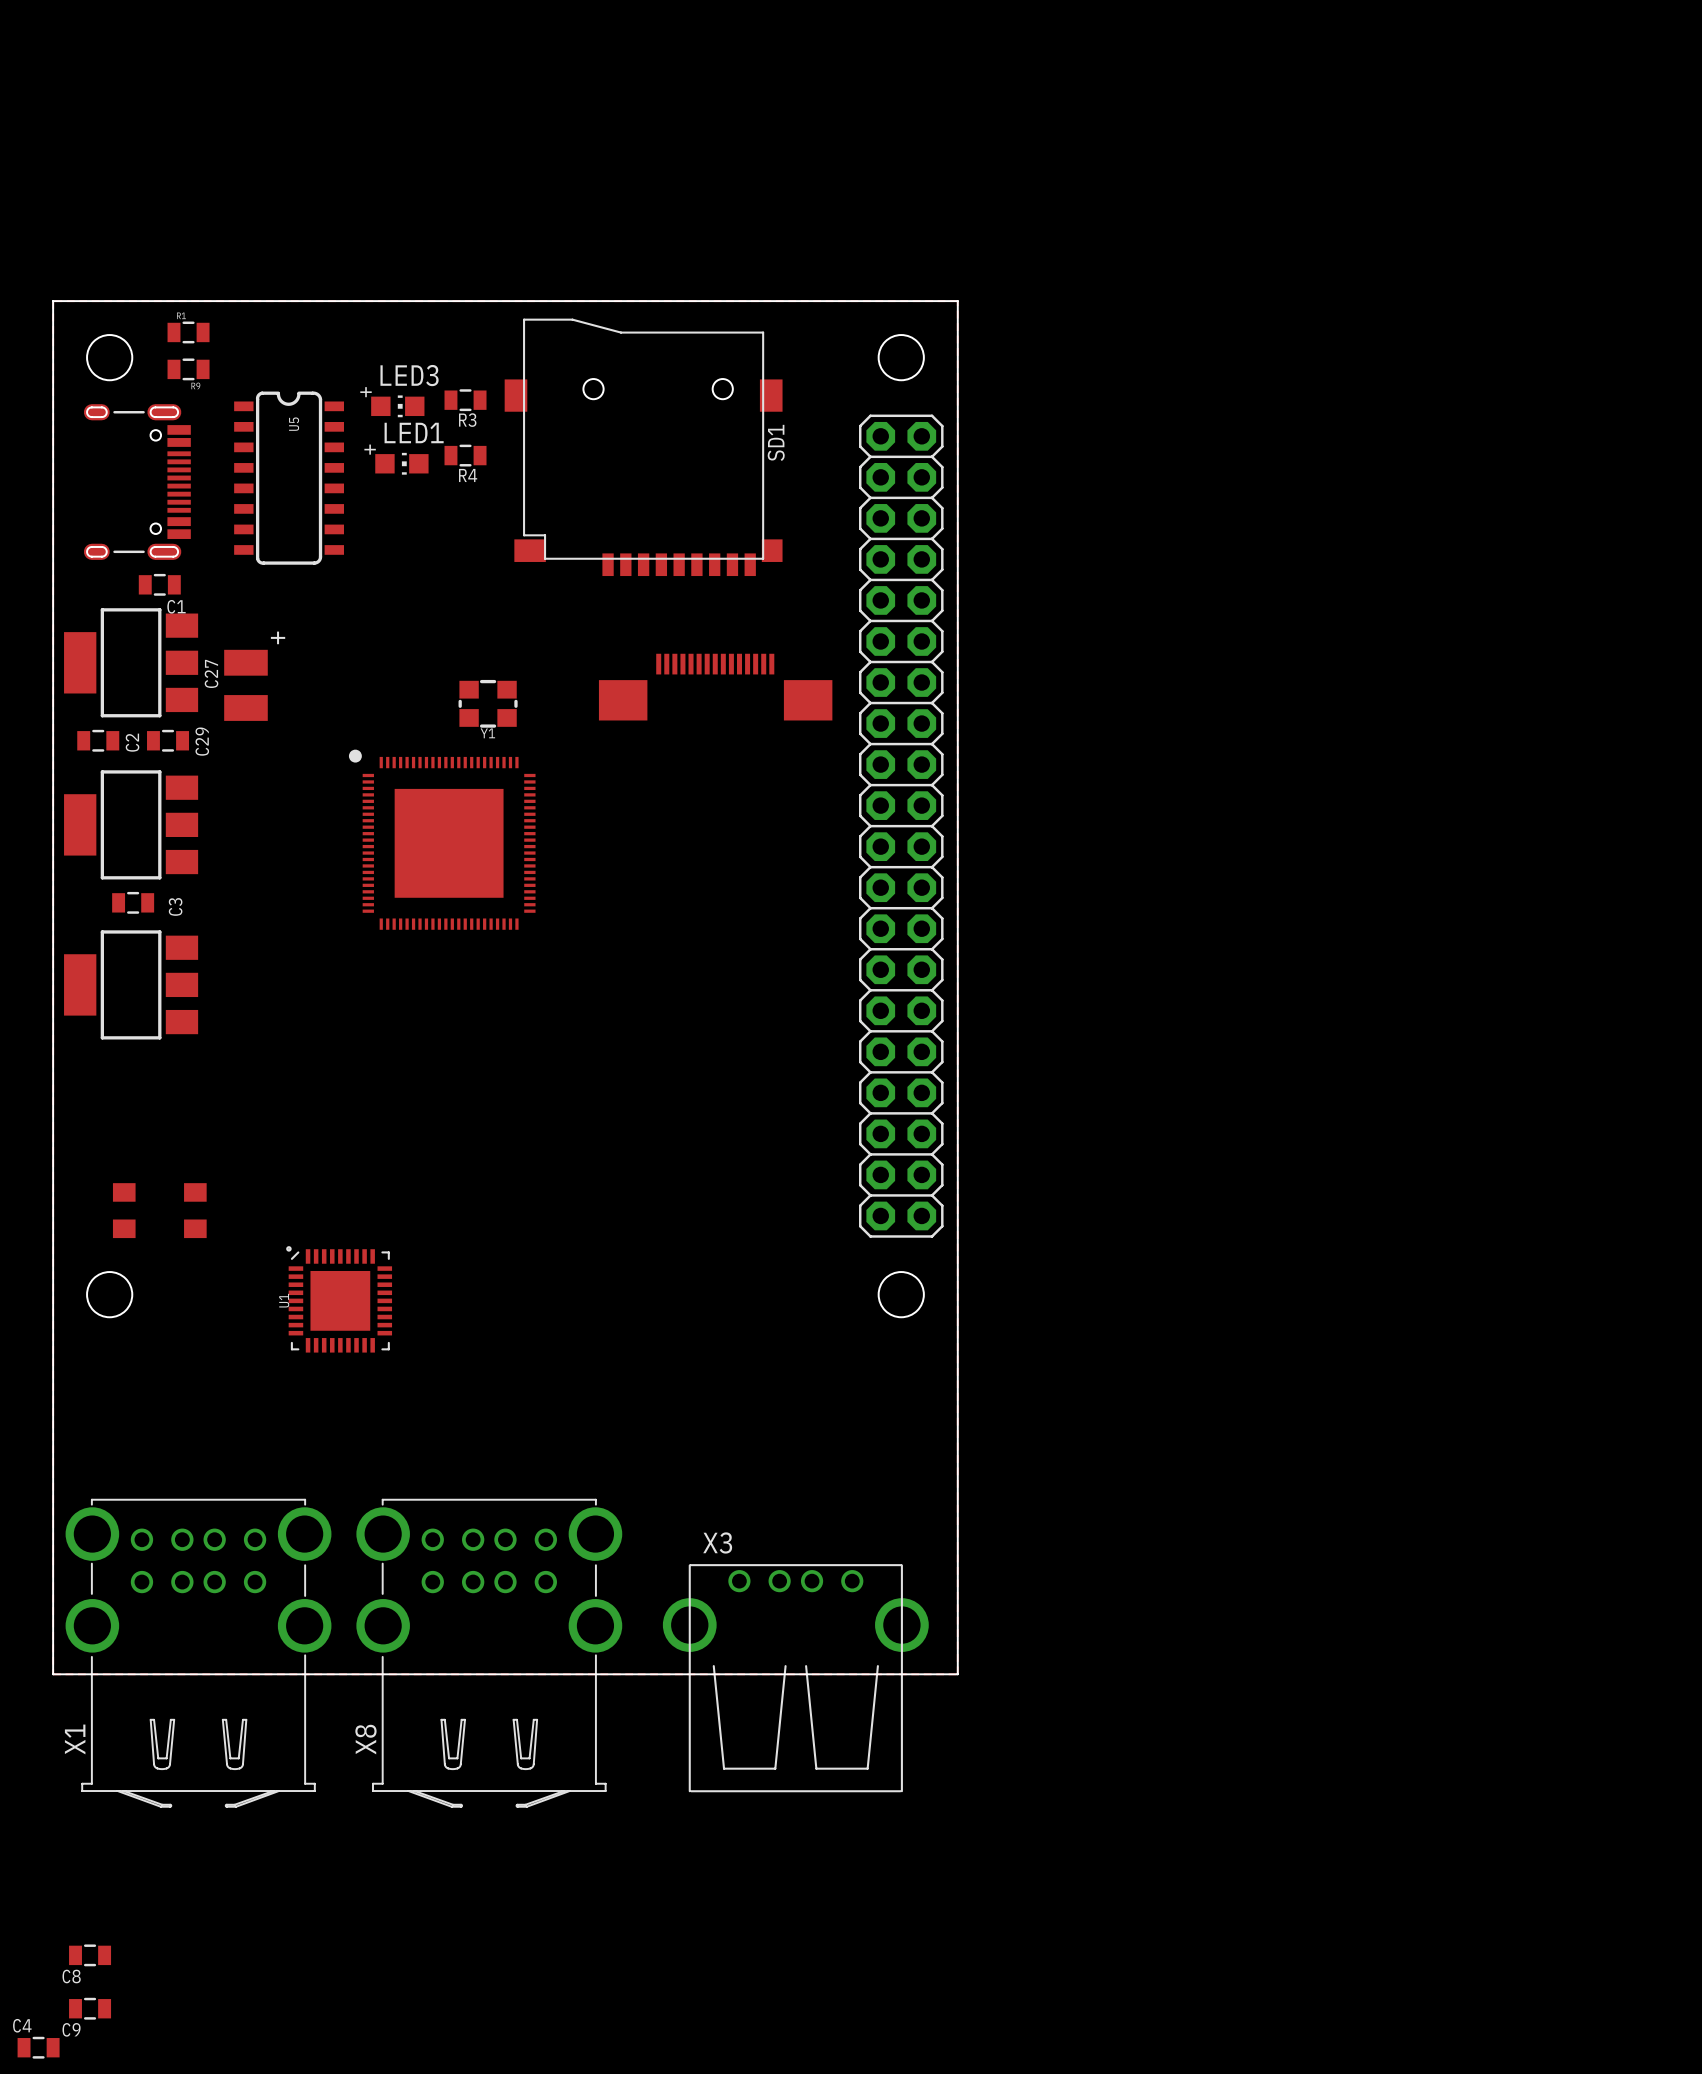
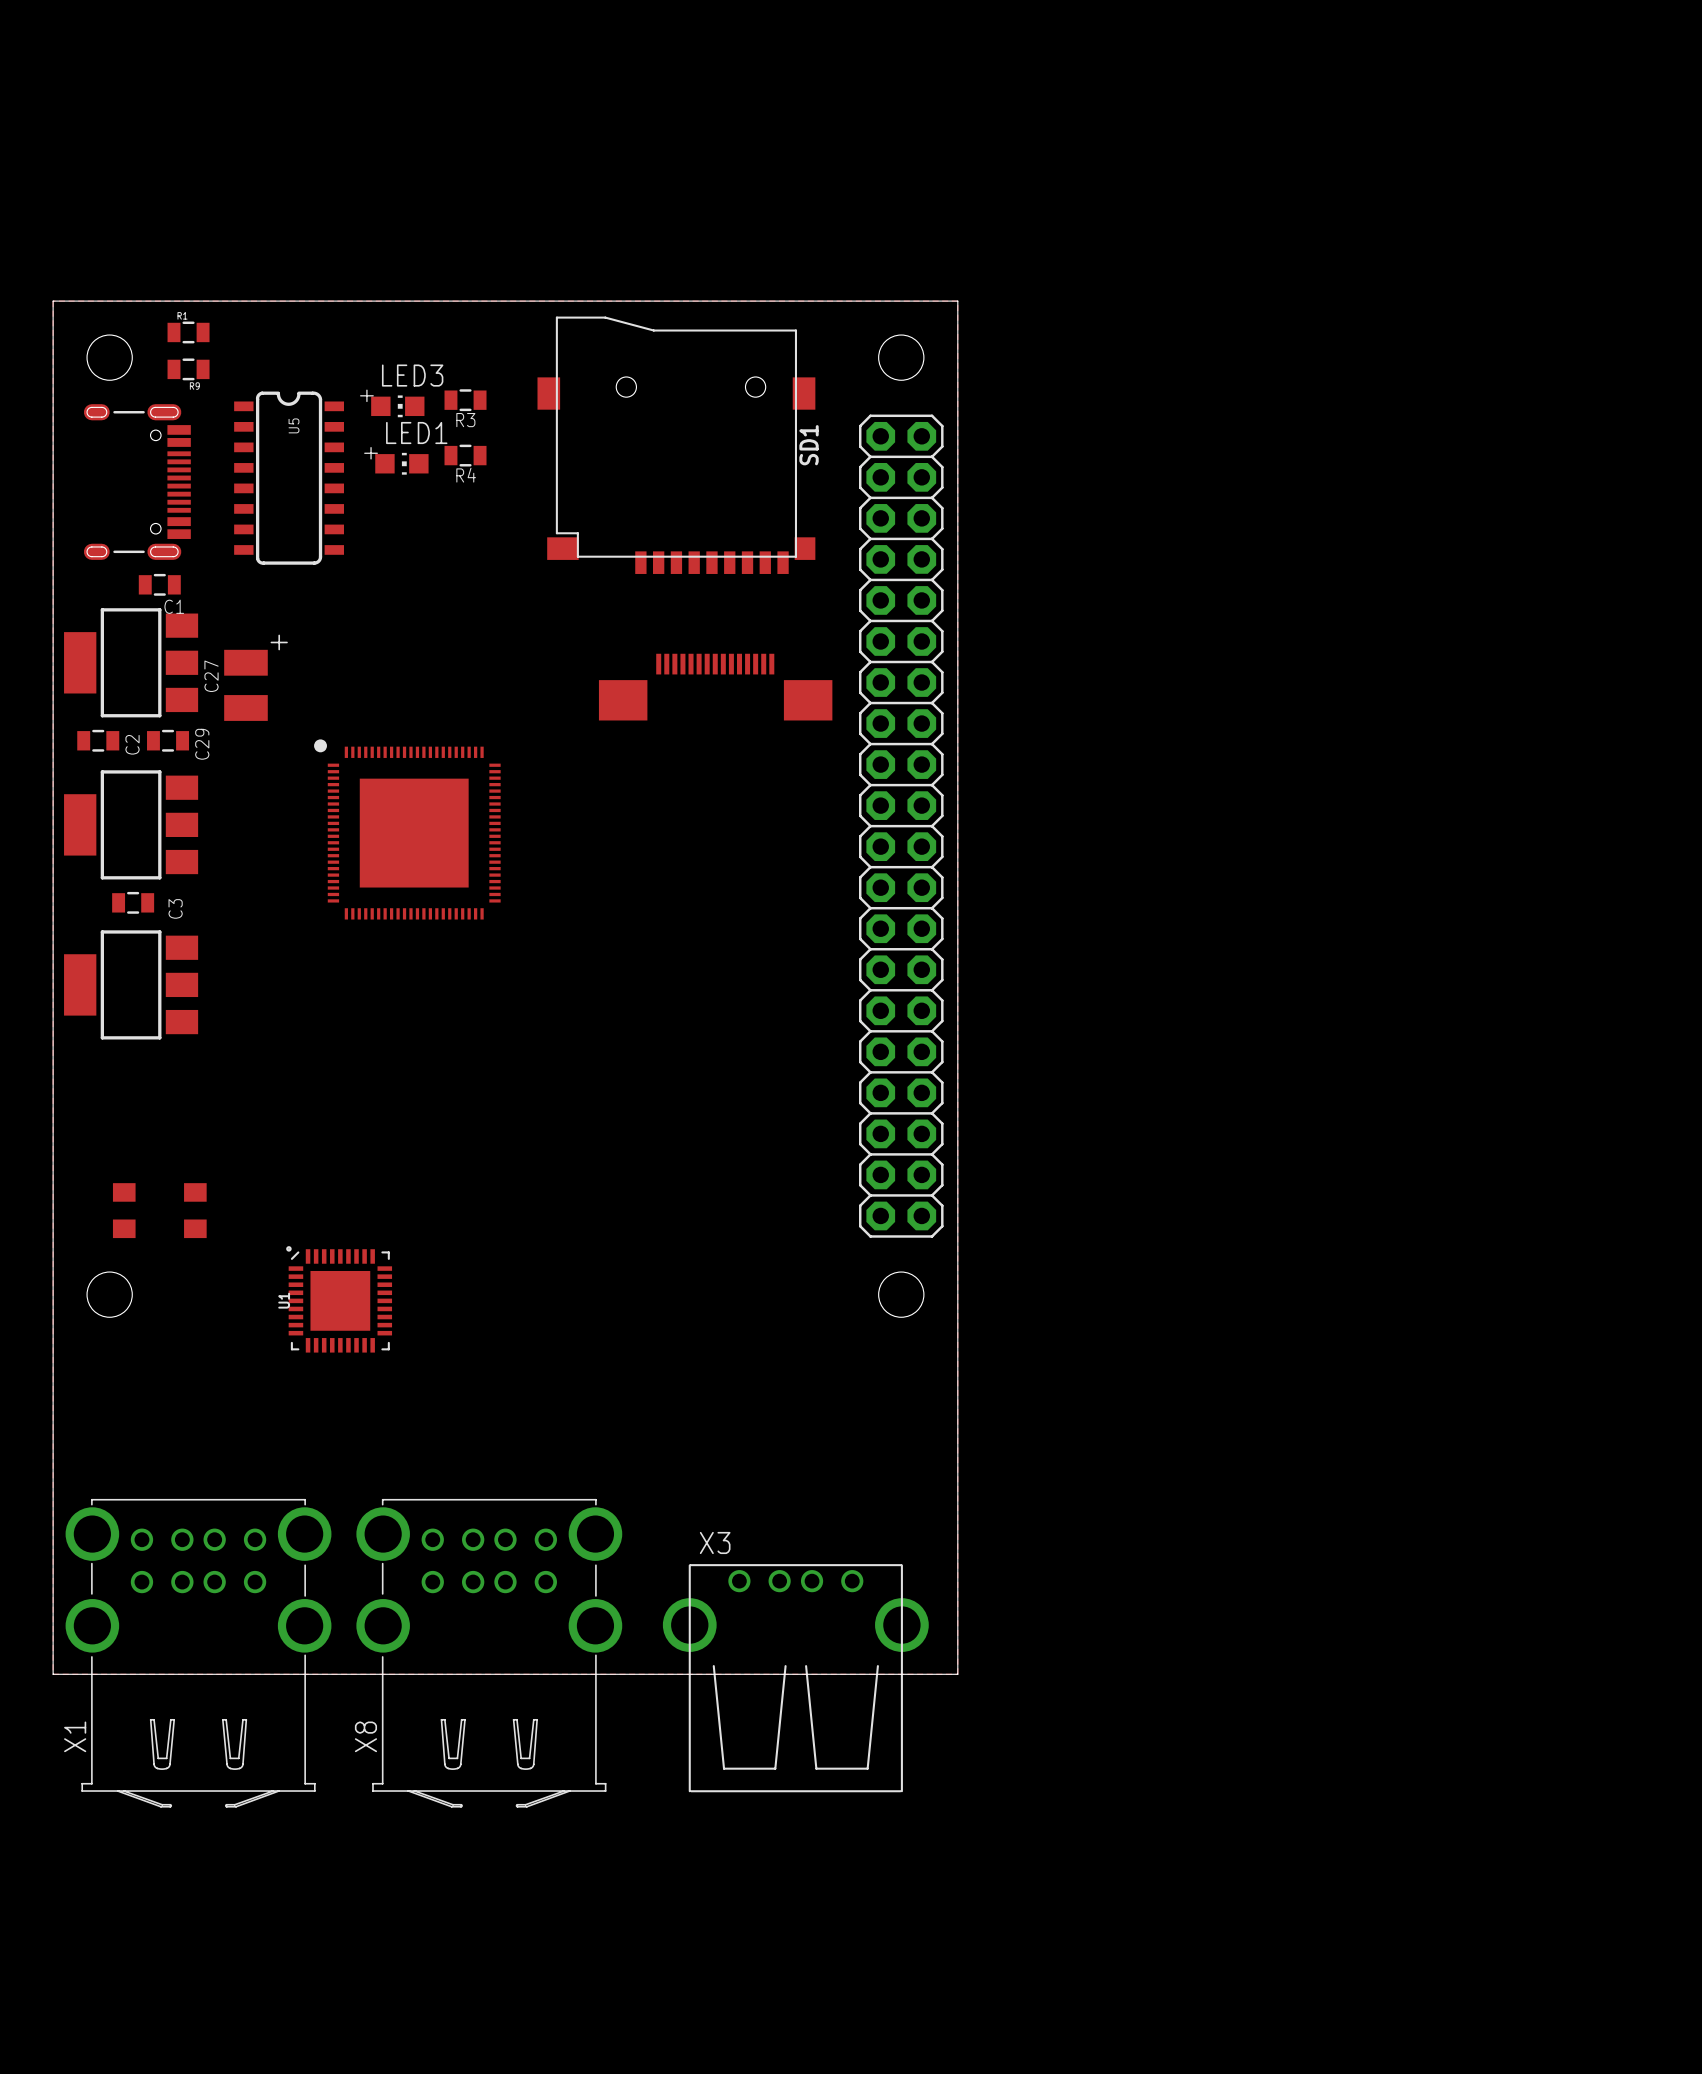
SD1 position: (643, 447) -> (676, 445)
Y1: (488, 703) -> none
part position: (442, 839) -> (407, 829)
C8: (90, 1955) -> none
C9: (90, 2008) -> none
C4: (38, 2047) -> none

